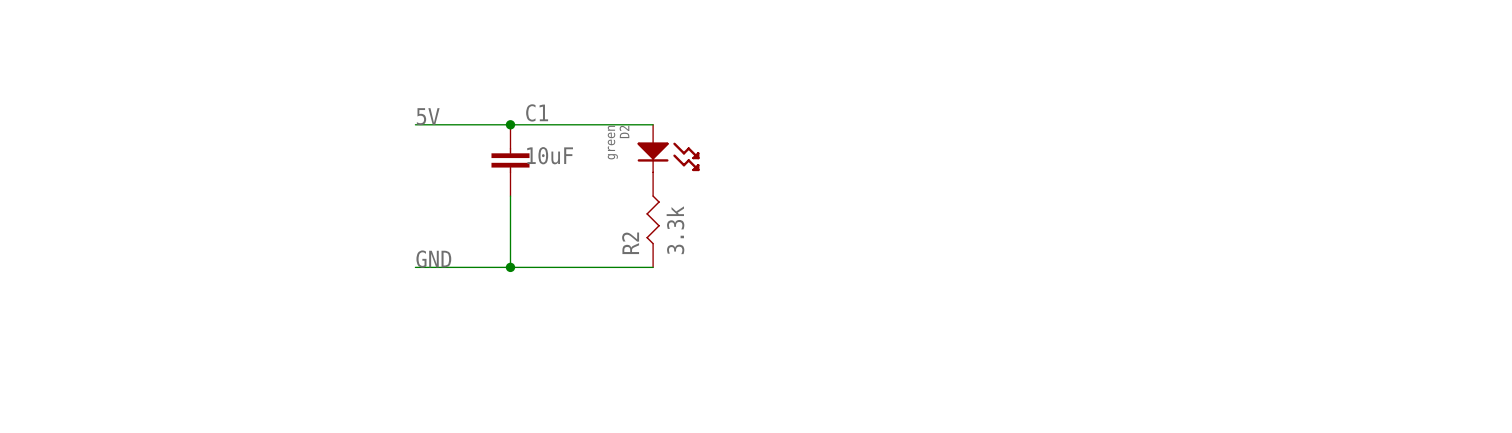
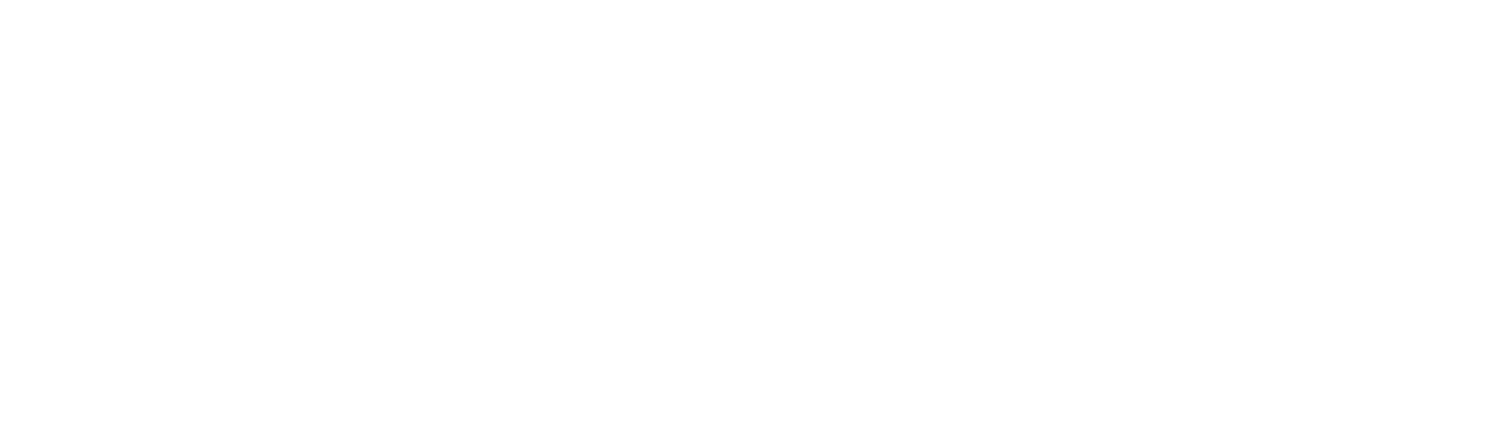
label: 5V (428, 116) -> none
wire: (415, 124) (653, 124) -> none
junction: (510, 124) -> none
D2: green (668, 148) -> none
C1: 10uF (510, 160) -> none
wire: (510, 196) (510, 267) -> none
R2: 3.3k (653, 219) -> none
label: GND (433, 259) -> none
wire: (415, 267) (653, 267) -> none
junction: (510, 267) -> none

